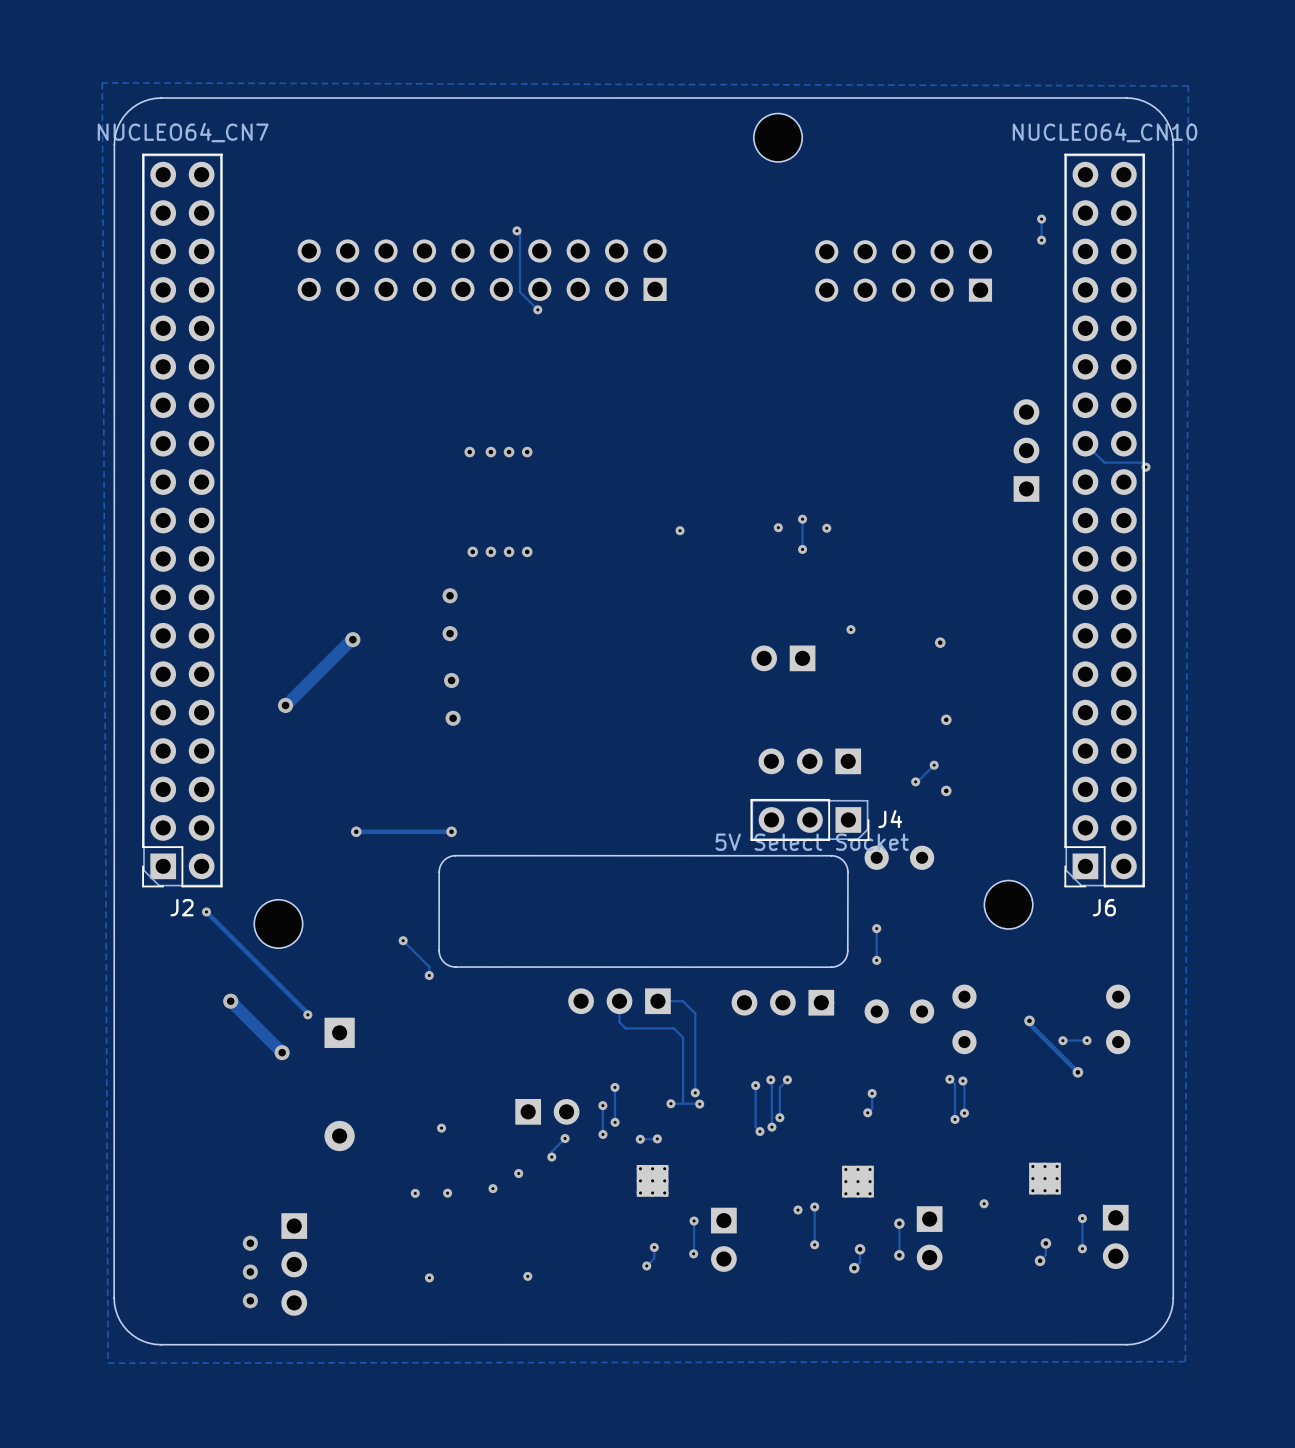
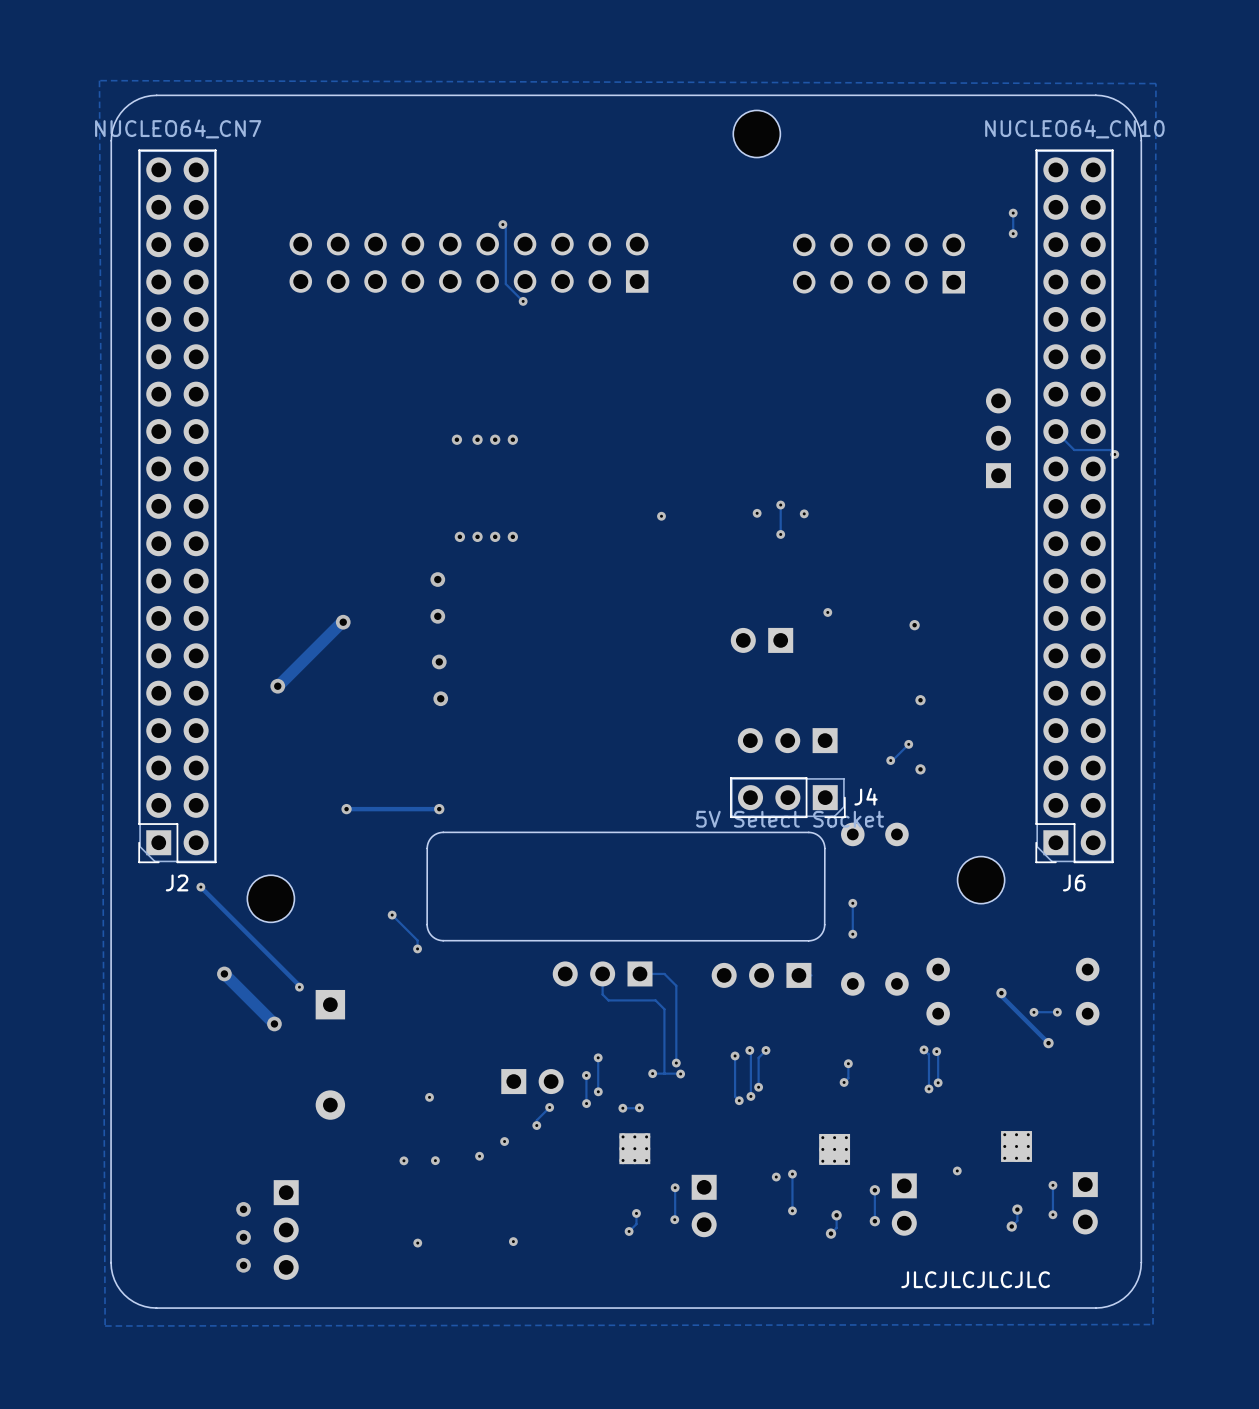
text: none -> JLCJLCJLCJLC (975, 1279)

